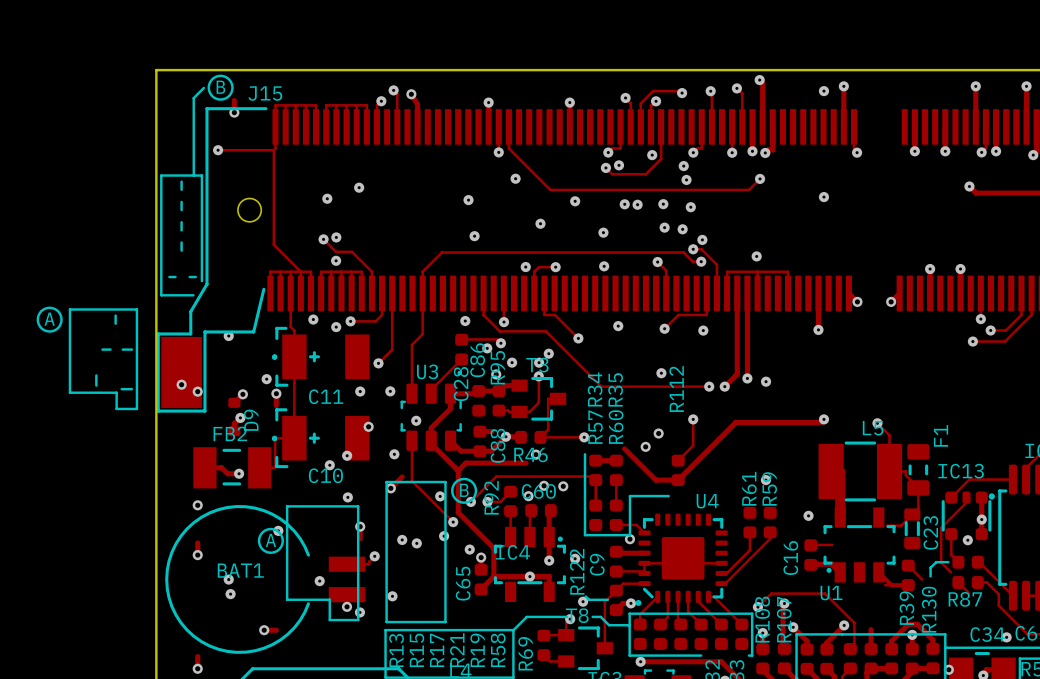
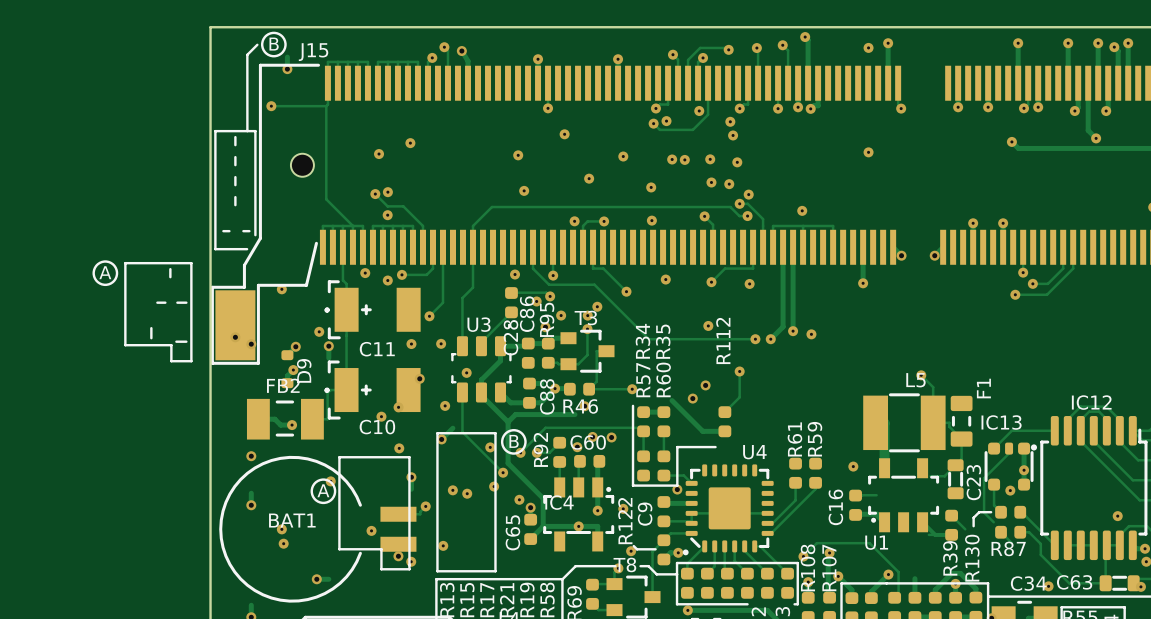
track: (508, 126) (508, 148) (550, 189) (749, 189) (760, 178) -> none
via: (760, 178) -> none
track: (823, 419) (820, 422) (735, 422) (678, 480) -> none
via: (823, 419) -> none
via: (765, 480) -> none

